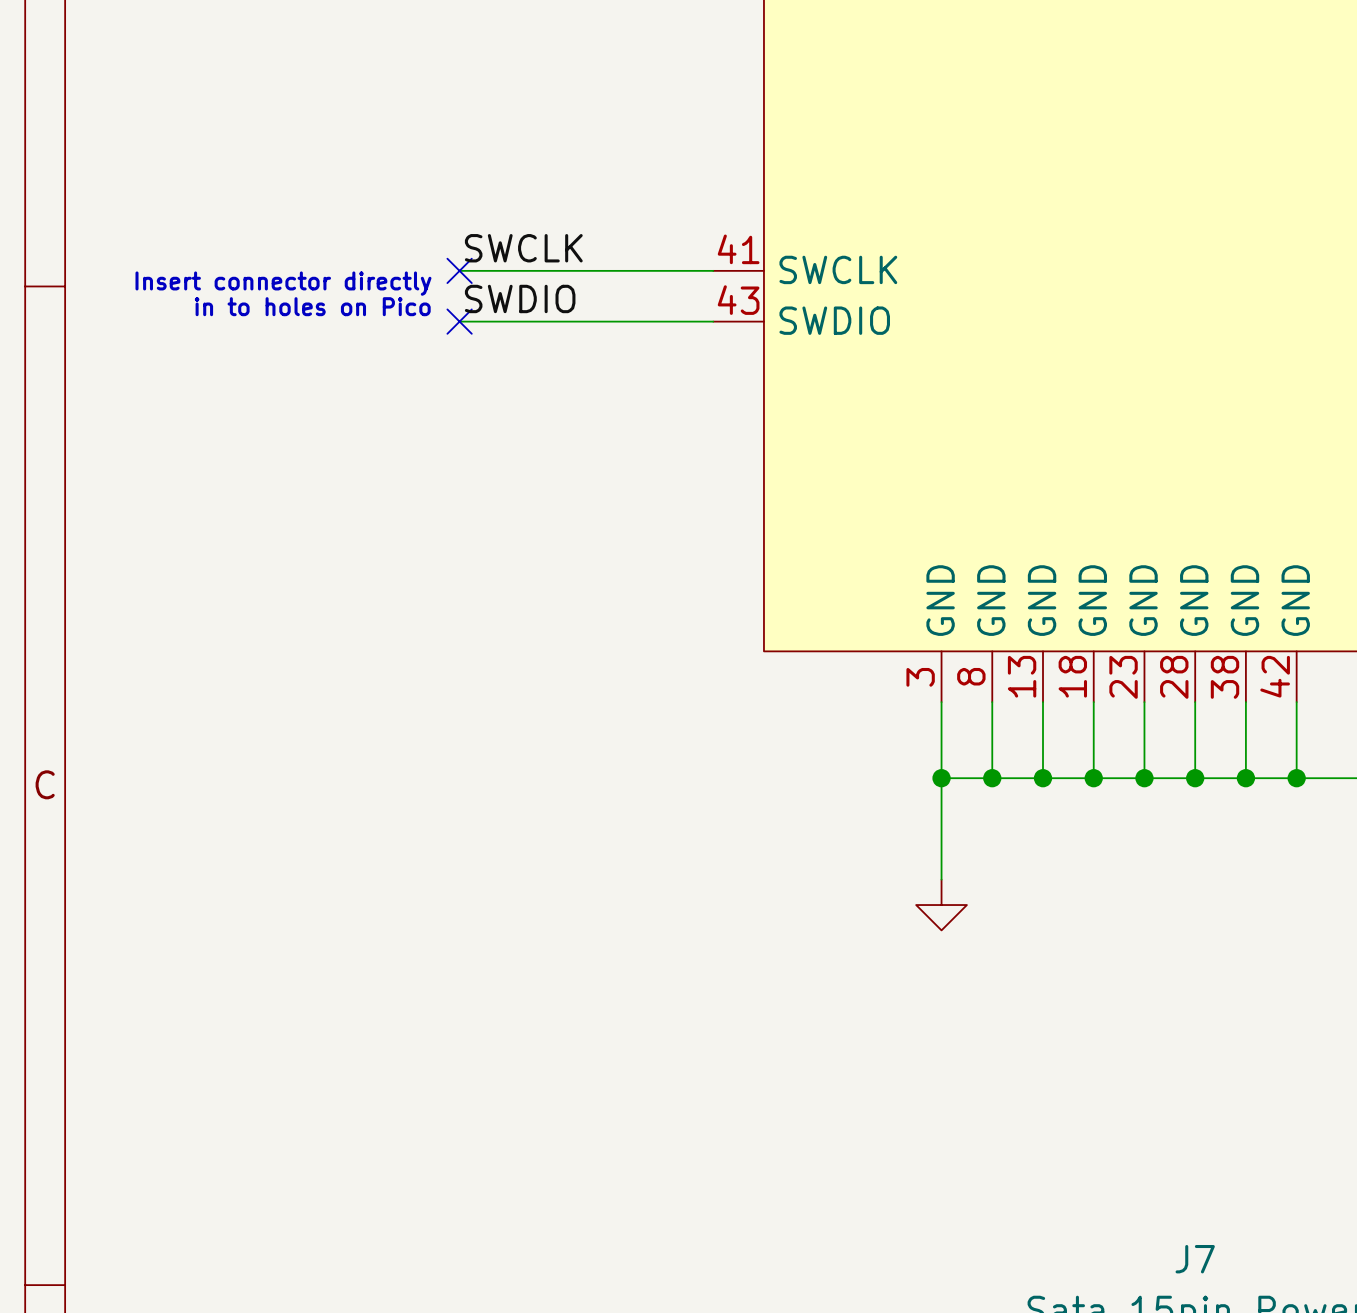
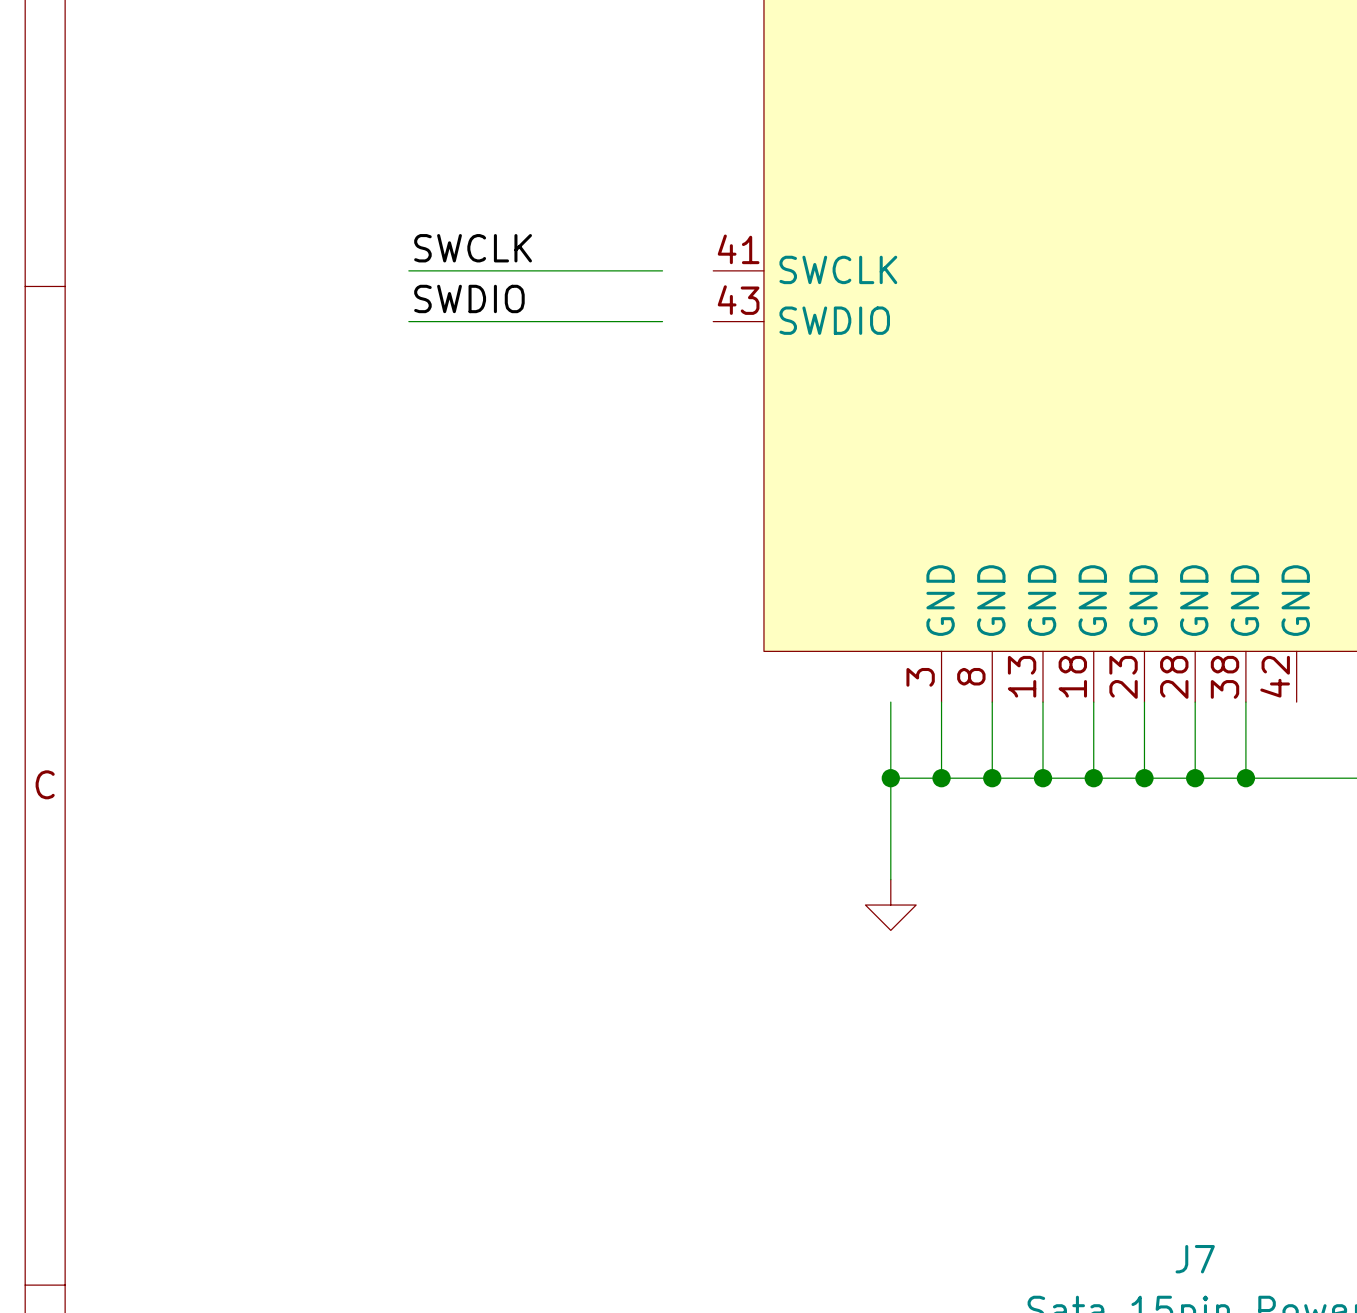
label position: SWCLK (523, 248) -> SWCLK (473, 248)
no-connect mark: (459, 270) -> none
wire: (662, 270) (713, 270) -> (408, 270) (459, 270)
text: Insert connector directly (283, 283) -> none
label position: SWDIO (520, 298) -> SWDIO (469, 298)
text: in to holes on Pico (312, 306) -> none
no-connect mark: (459, 321) -> none
wire: (662, 321) (713, 321) -> (408, 321) (459, 321)
wire: none -> (890, 702) (890, 879)
wire: (1296, 702) (1296, 778) -> none
junction: none -> (890, 778)
wire: (941, 778) (941, 879) -> (941, 778) (890, 778)
junction: (1296, 778) -> none
power symbol position: (941, 905) -> (890, 905)

